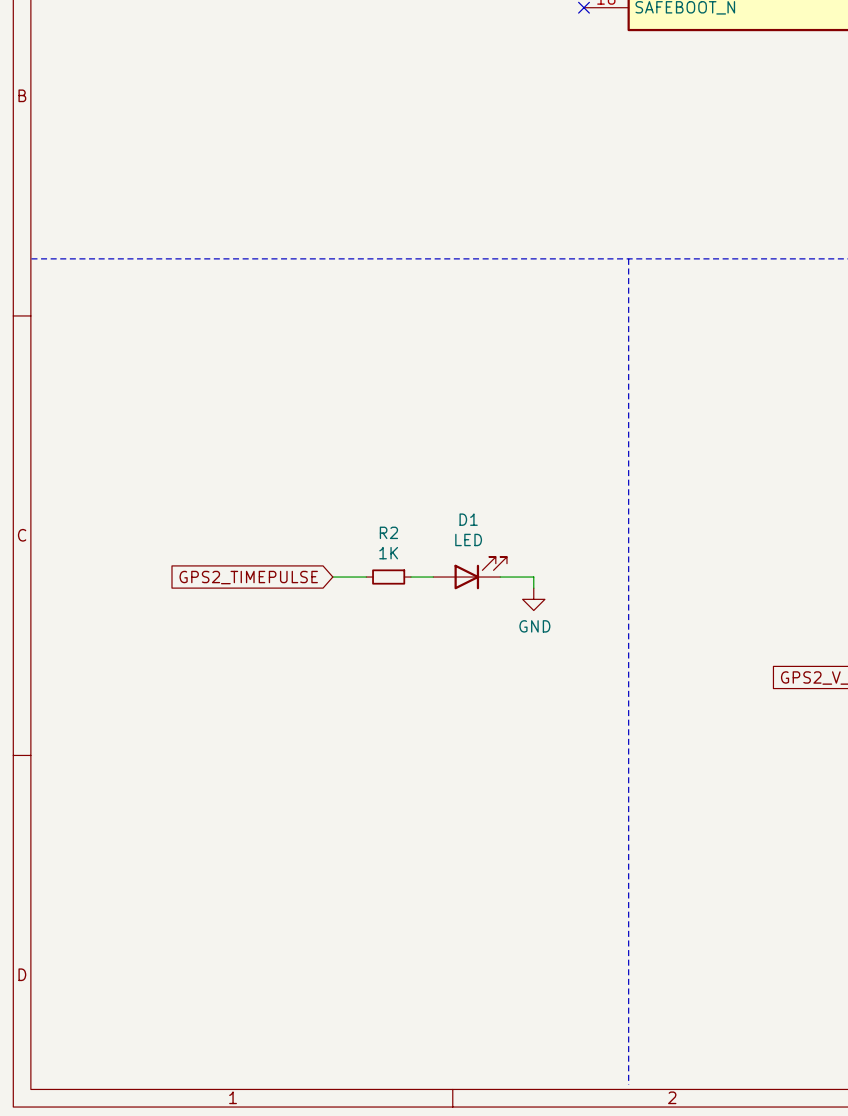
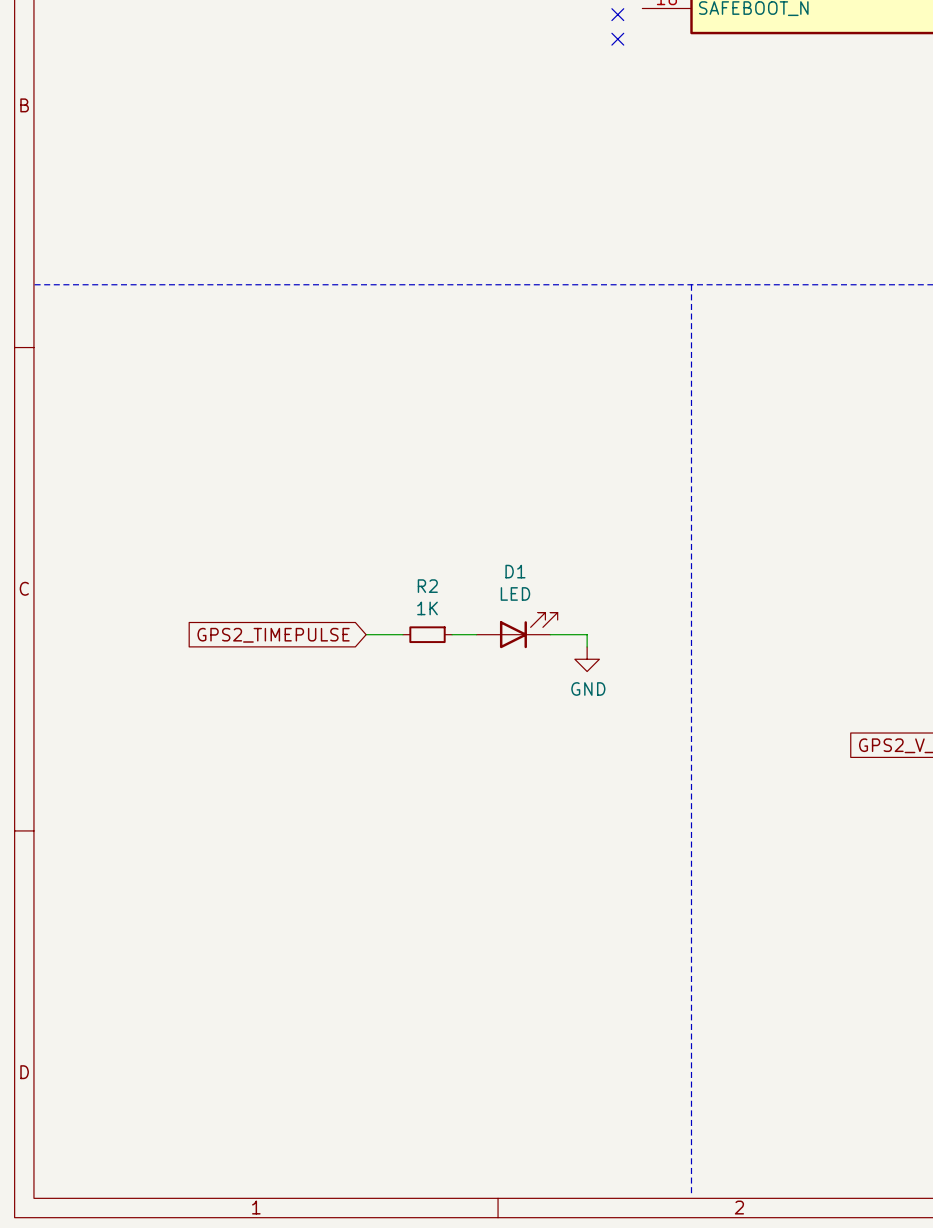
no-connect mark: (584, 7) -> none
no-connect mark: none -> (617, 14)
no-connect mark: none -> (617, 39)

